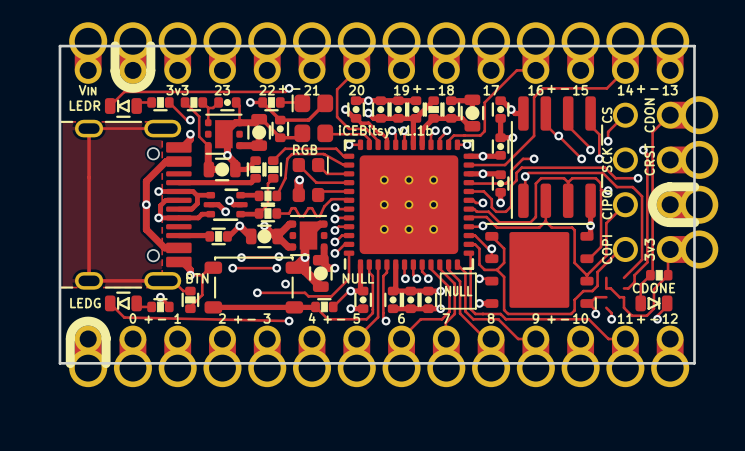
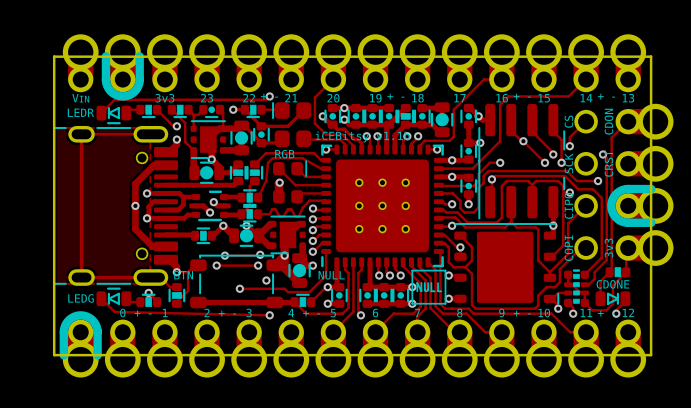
part: none -> (576, 288)

